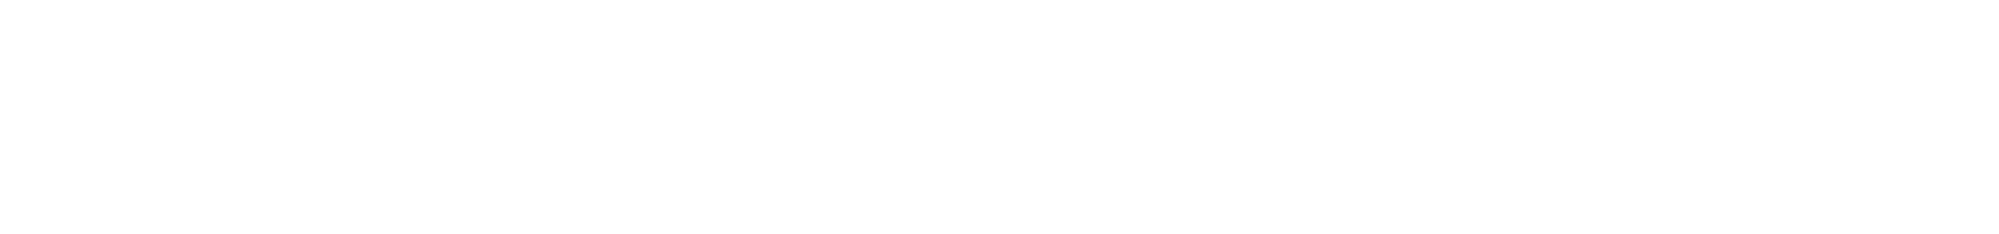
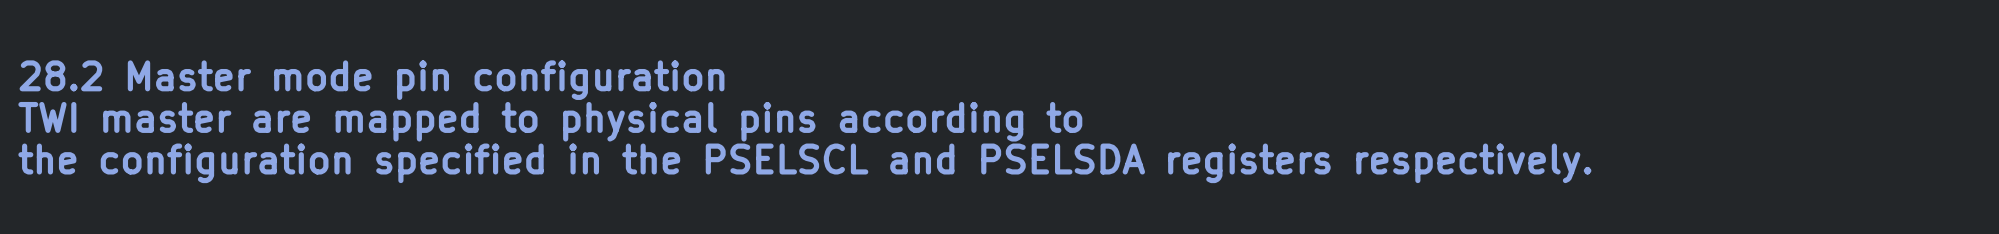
text: none -> 28.2 Master mode pin configuration (372, 80)
text: none -> TWI master are mapped to physical pins according to (550, 121)
text: none -> the configuration specified in the PSELSCL and PSELSDA registers respectively. (804, 163)

